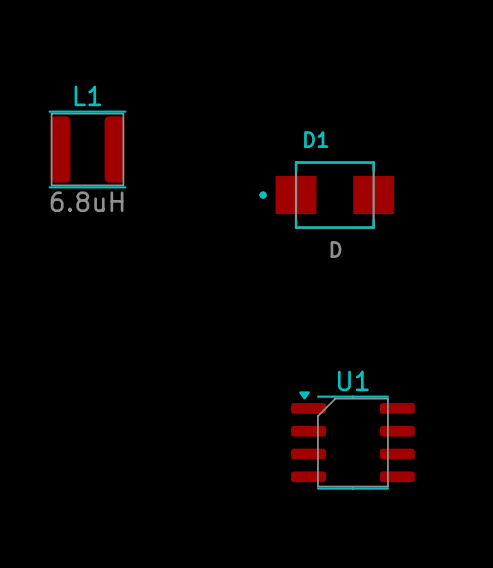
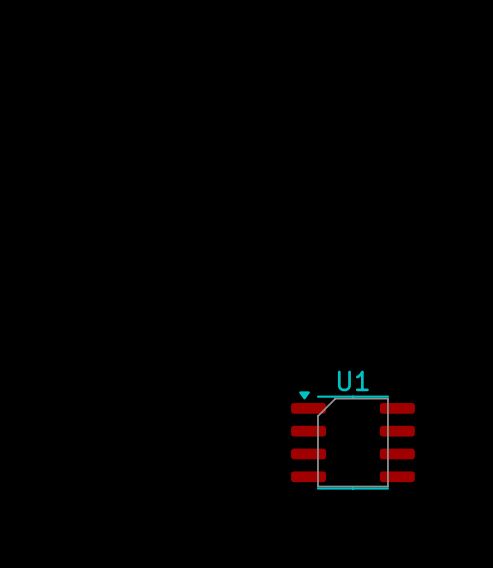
L1: 6.8uH (87, 149) -> none
D1: D (326, 195) -> none

